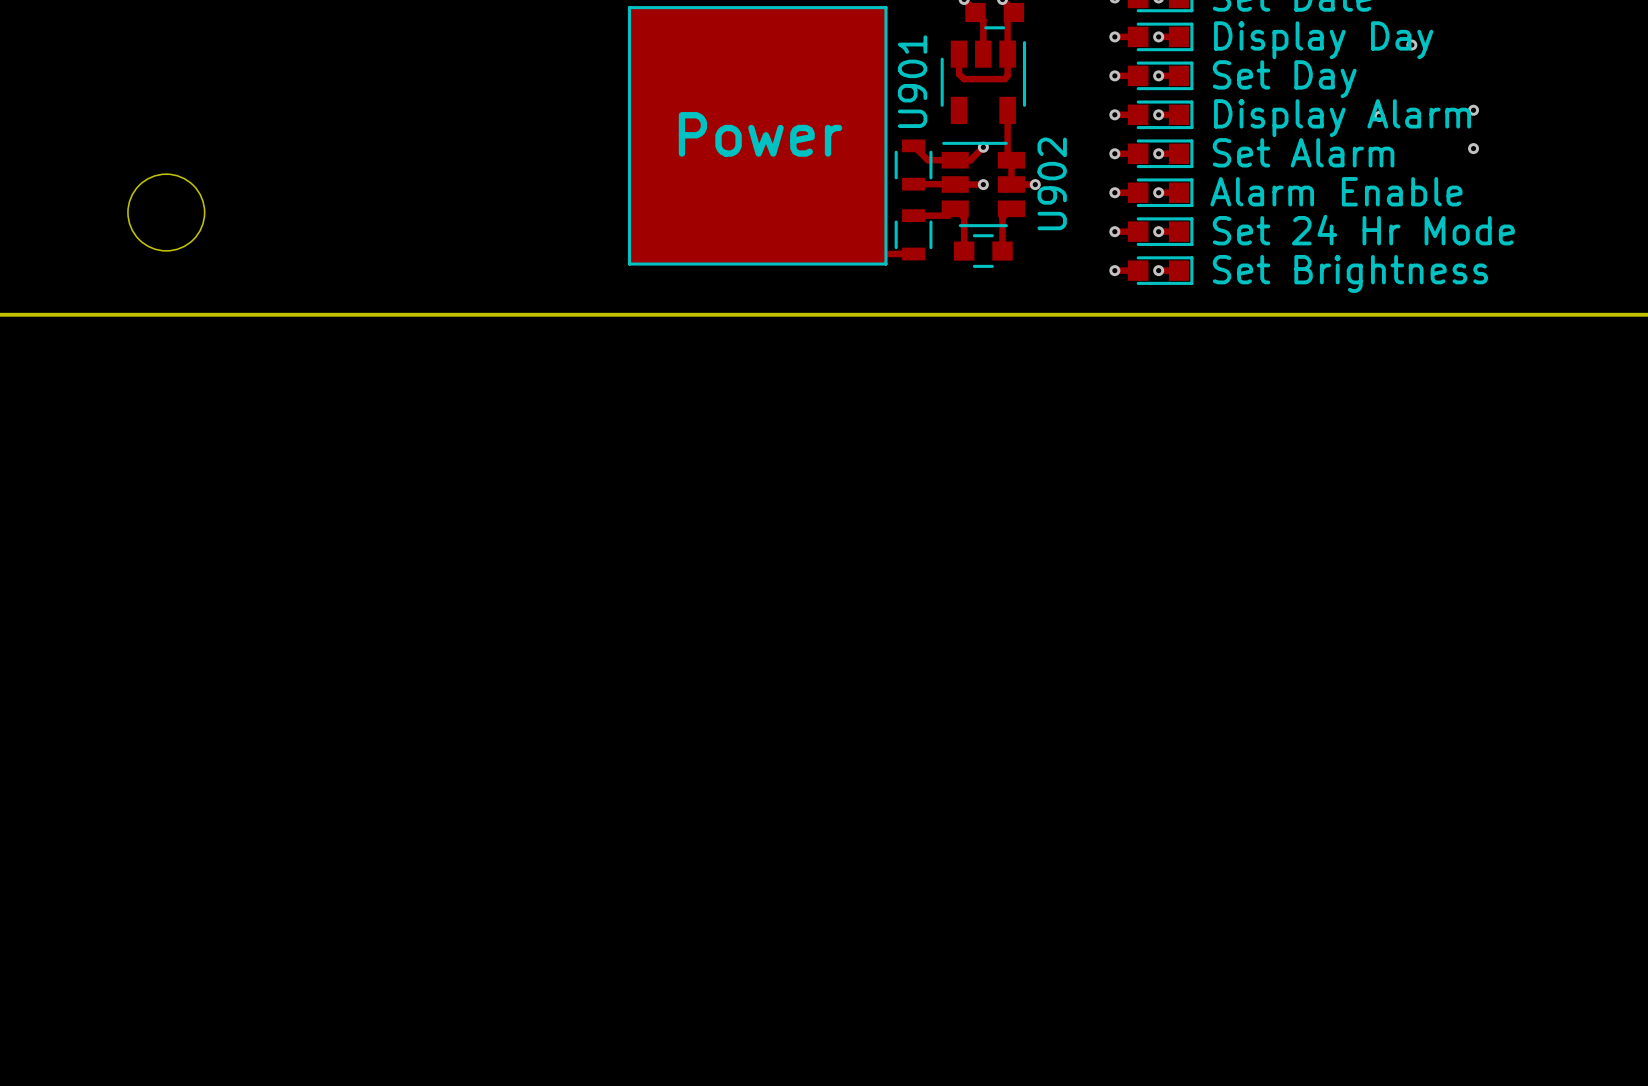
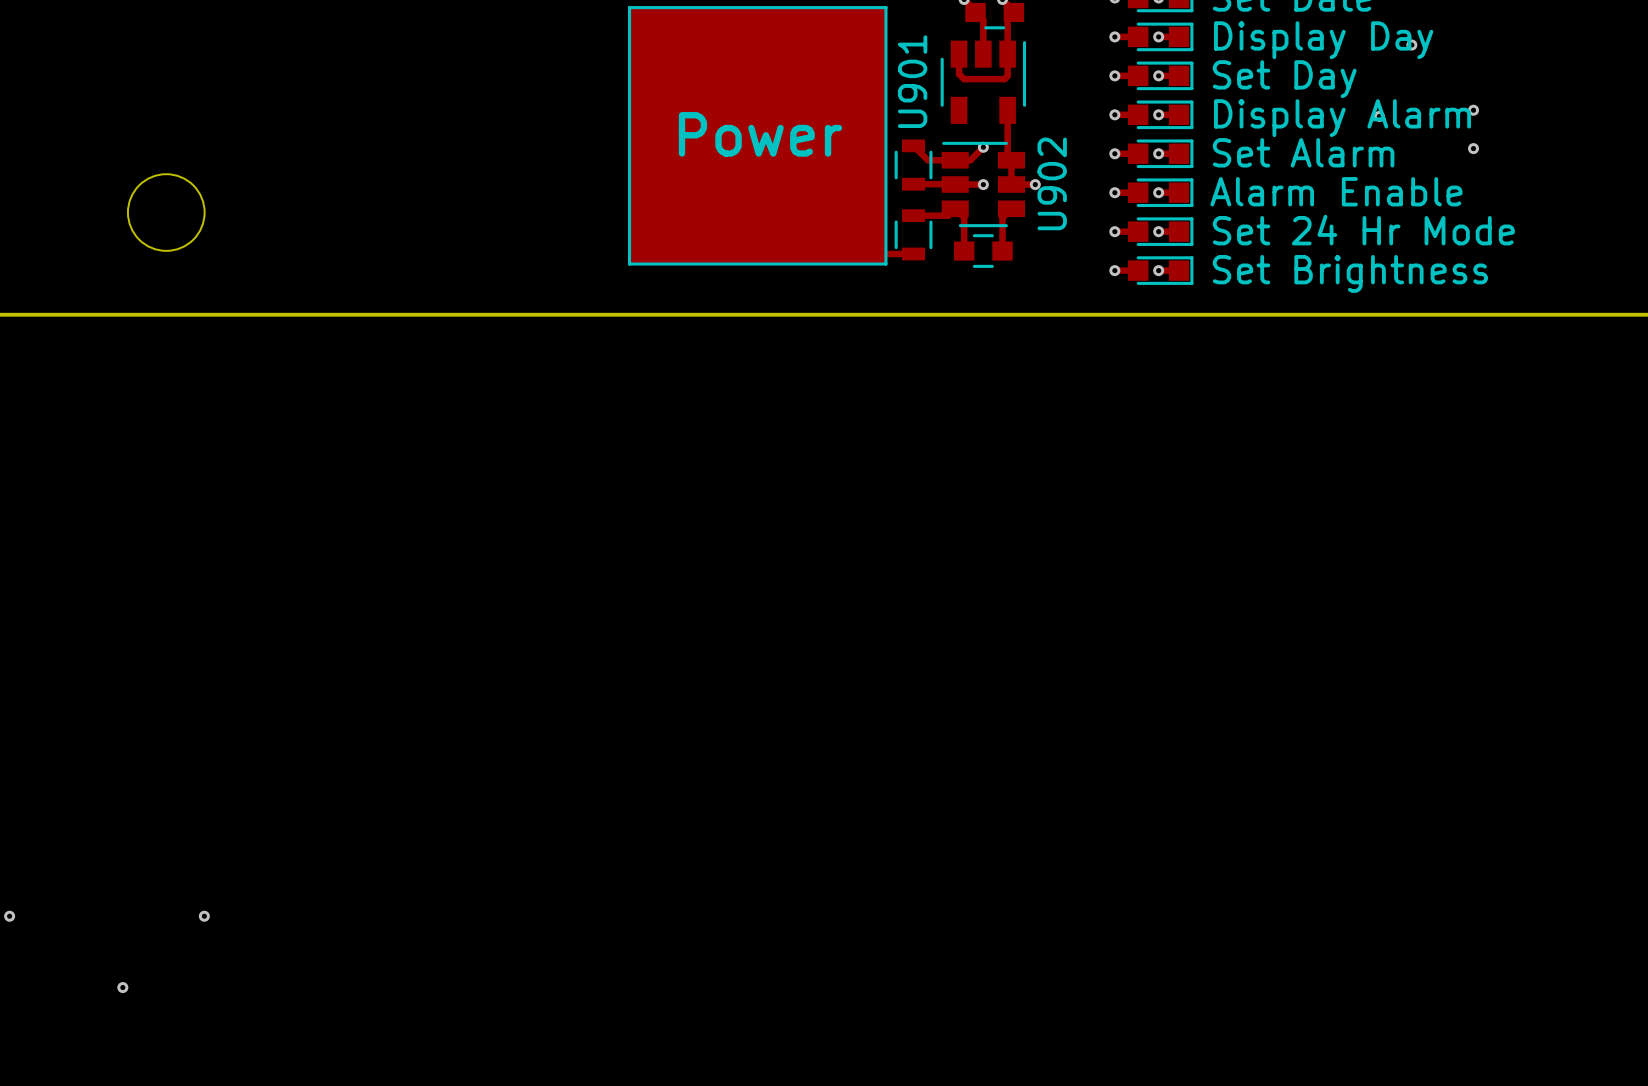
via: none -> (9, 916)
via: none -> (204, 916)
via: none -> (122, 987)

